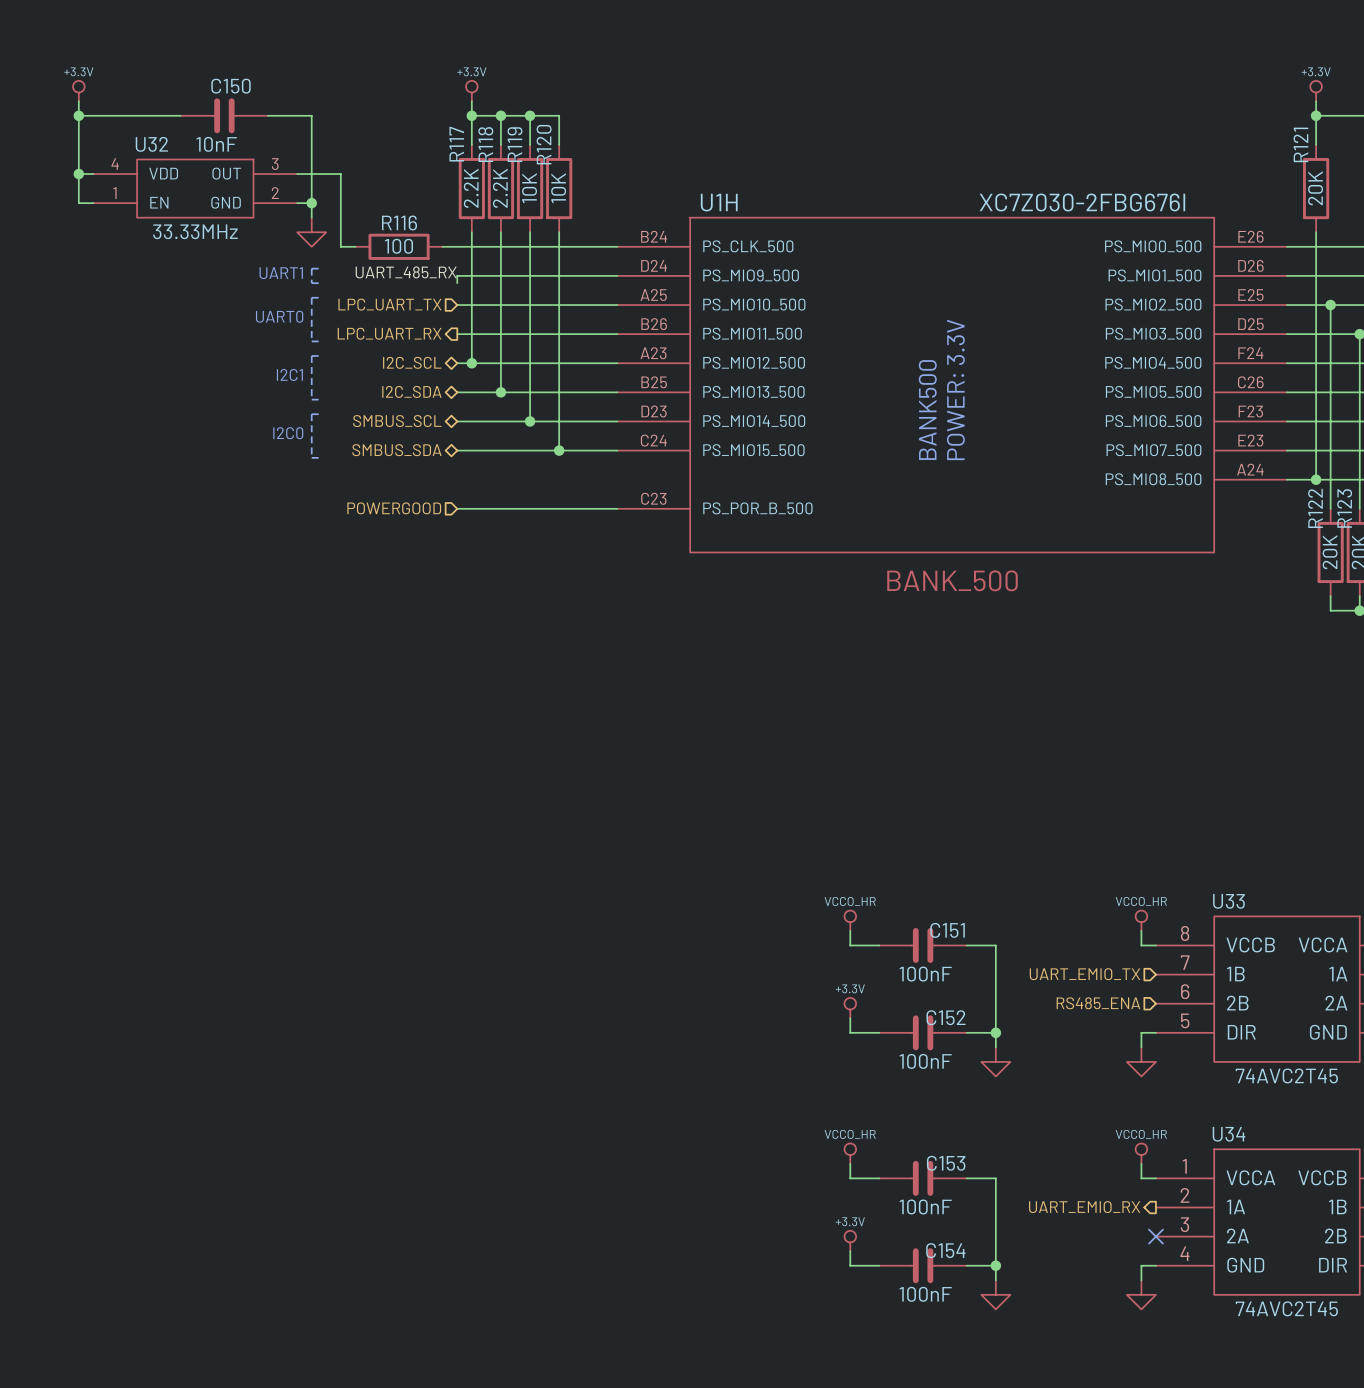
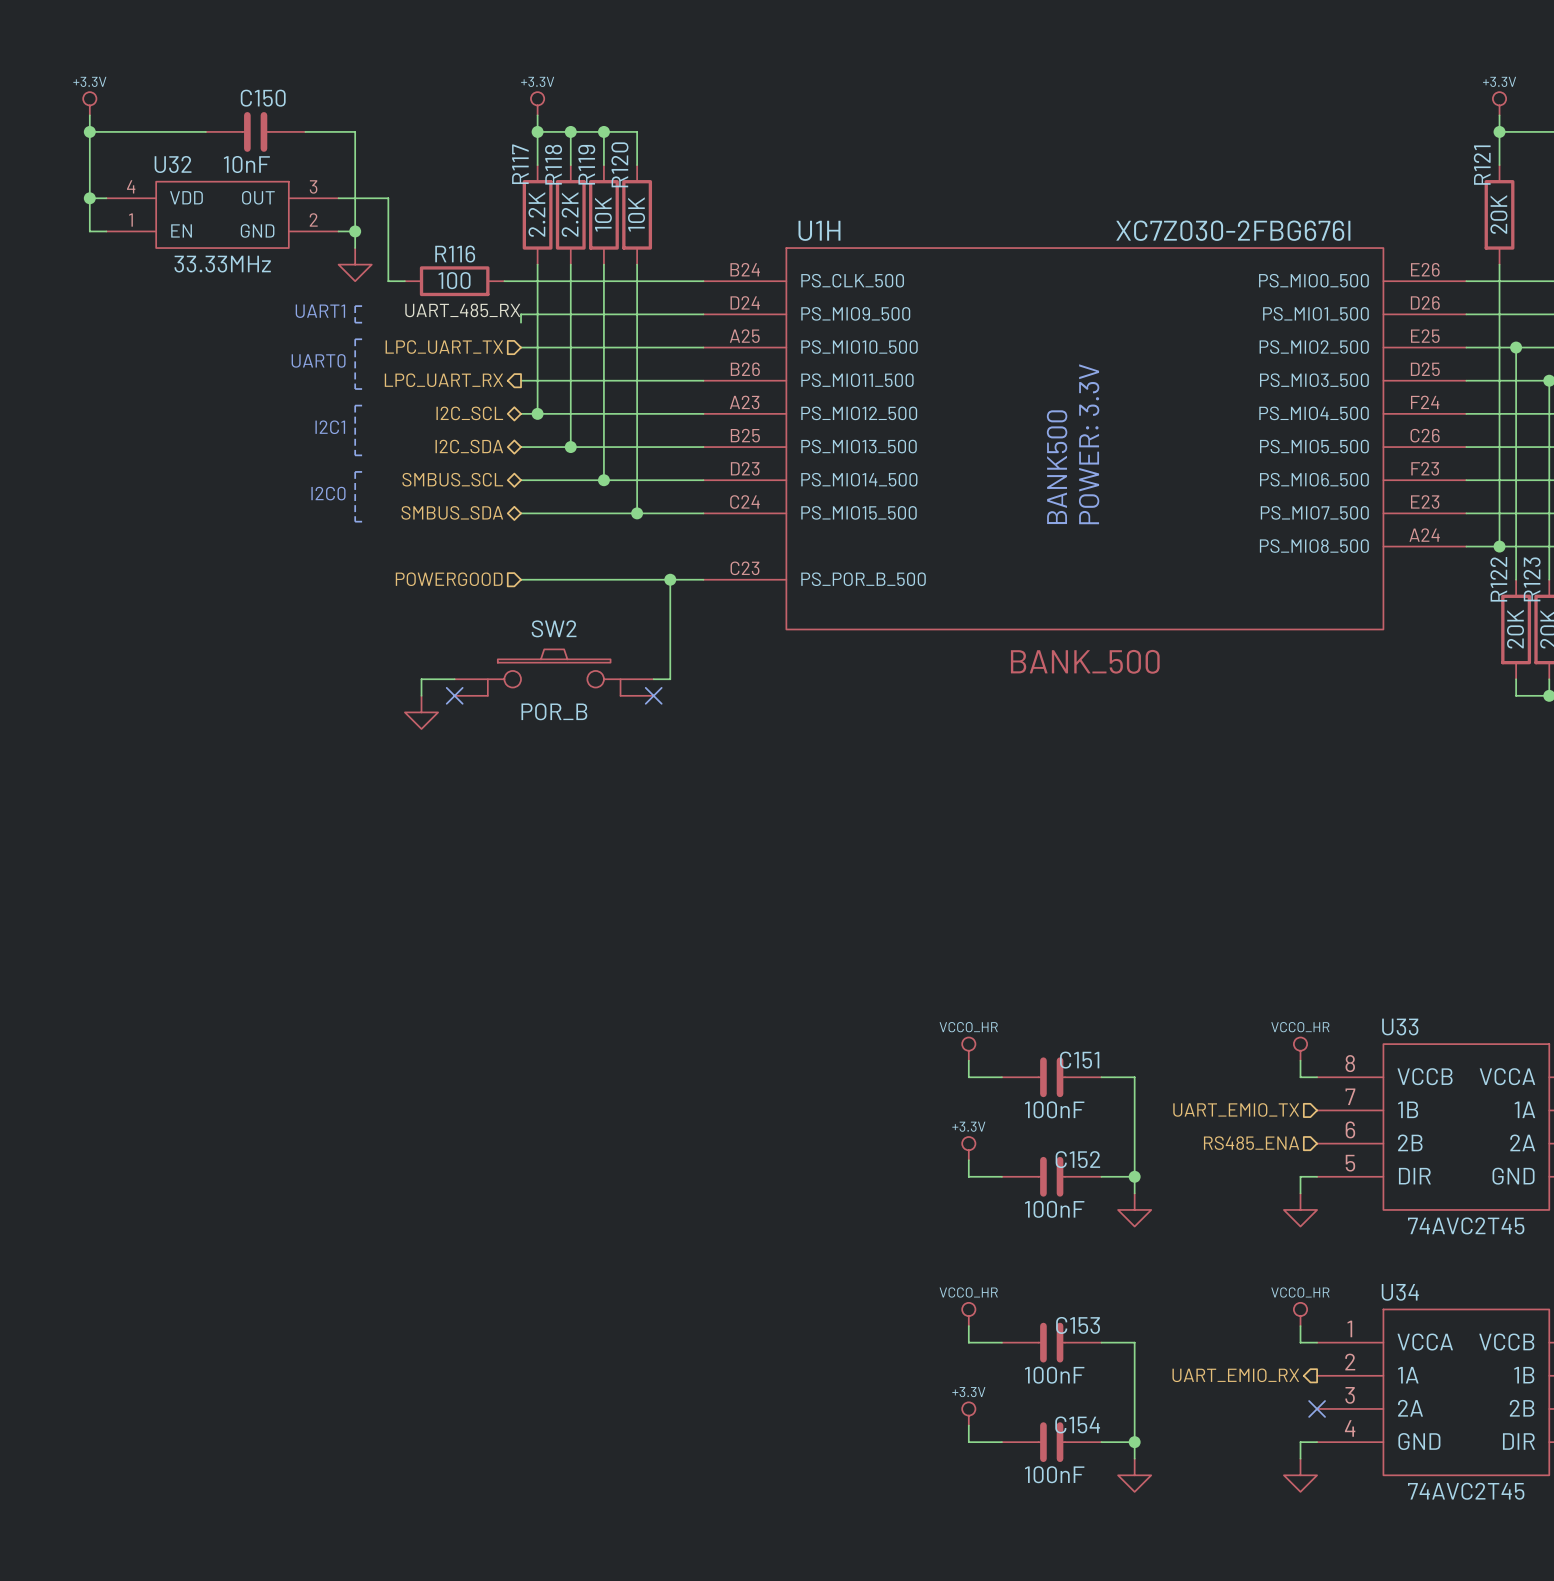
wire: none -> (670, 579) (670, 679) (653, 679)
junction: none -> (670, 579)
SW2: none -> POR_B (554, 672)
wire: none -> (454, 679) (421, 679) (421, 695)
no-connect mark: none -> (454, 695)
no-connect mark: none -> (653, 695)
power symbol: none -> (421, 712)

